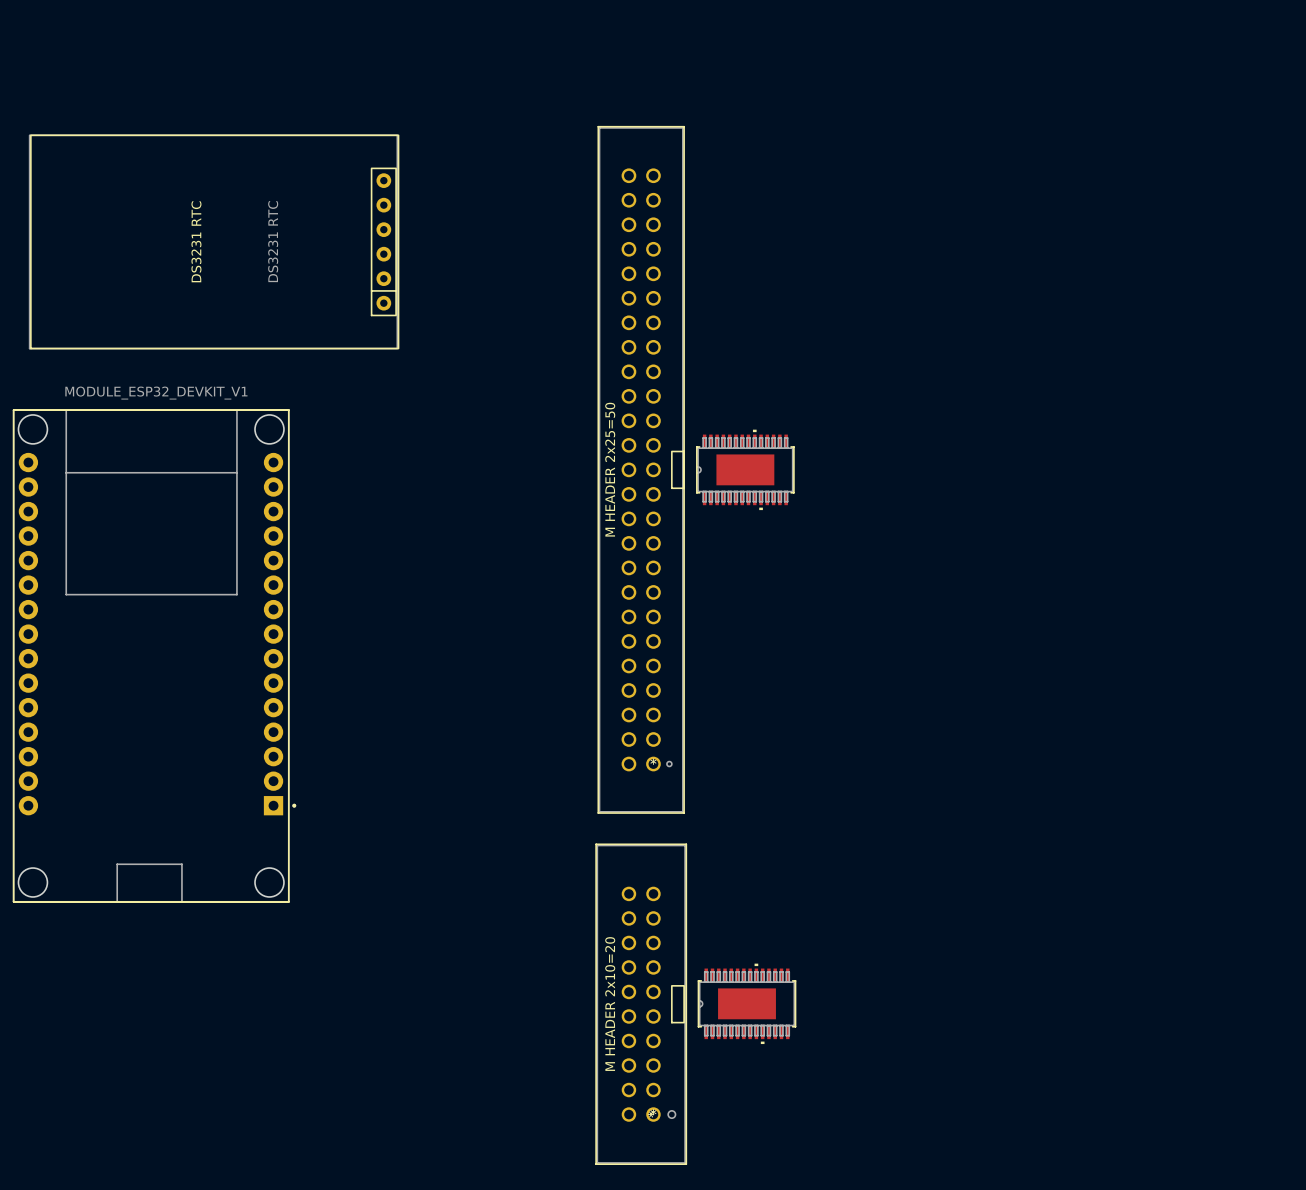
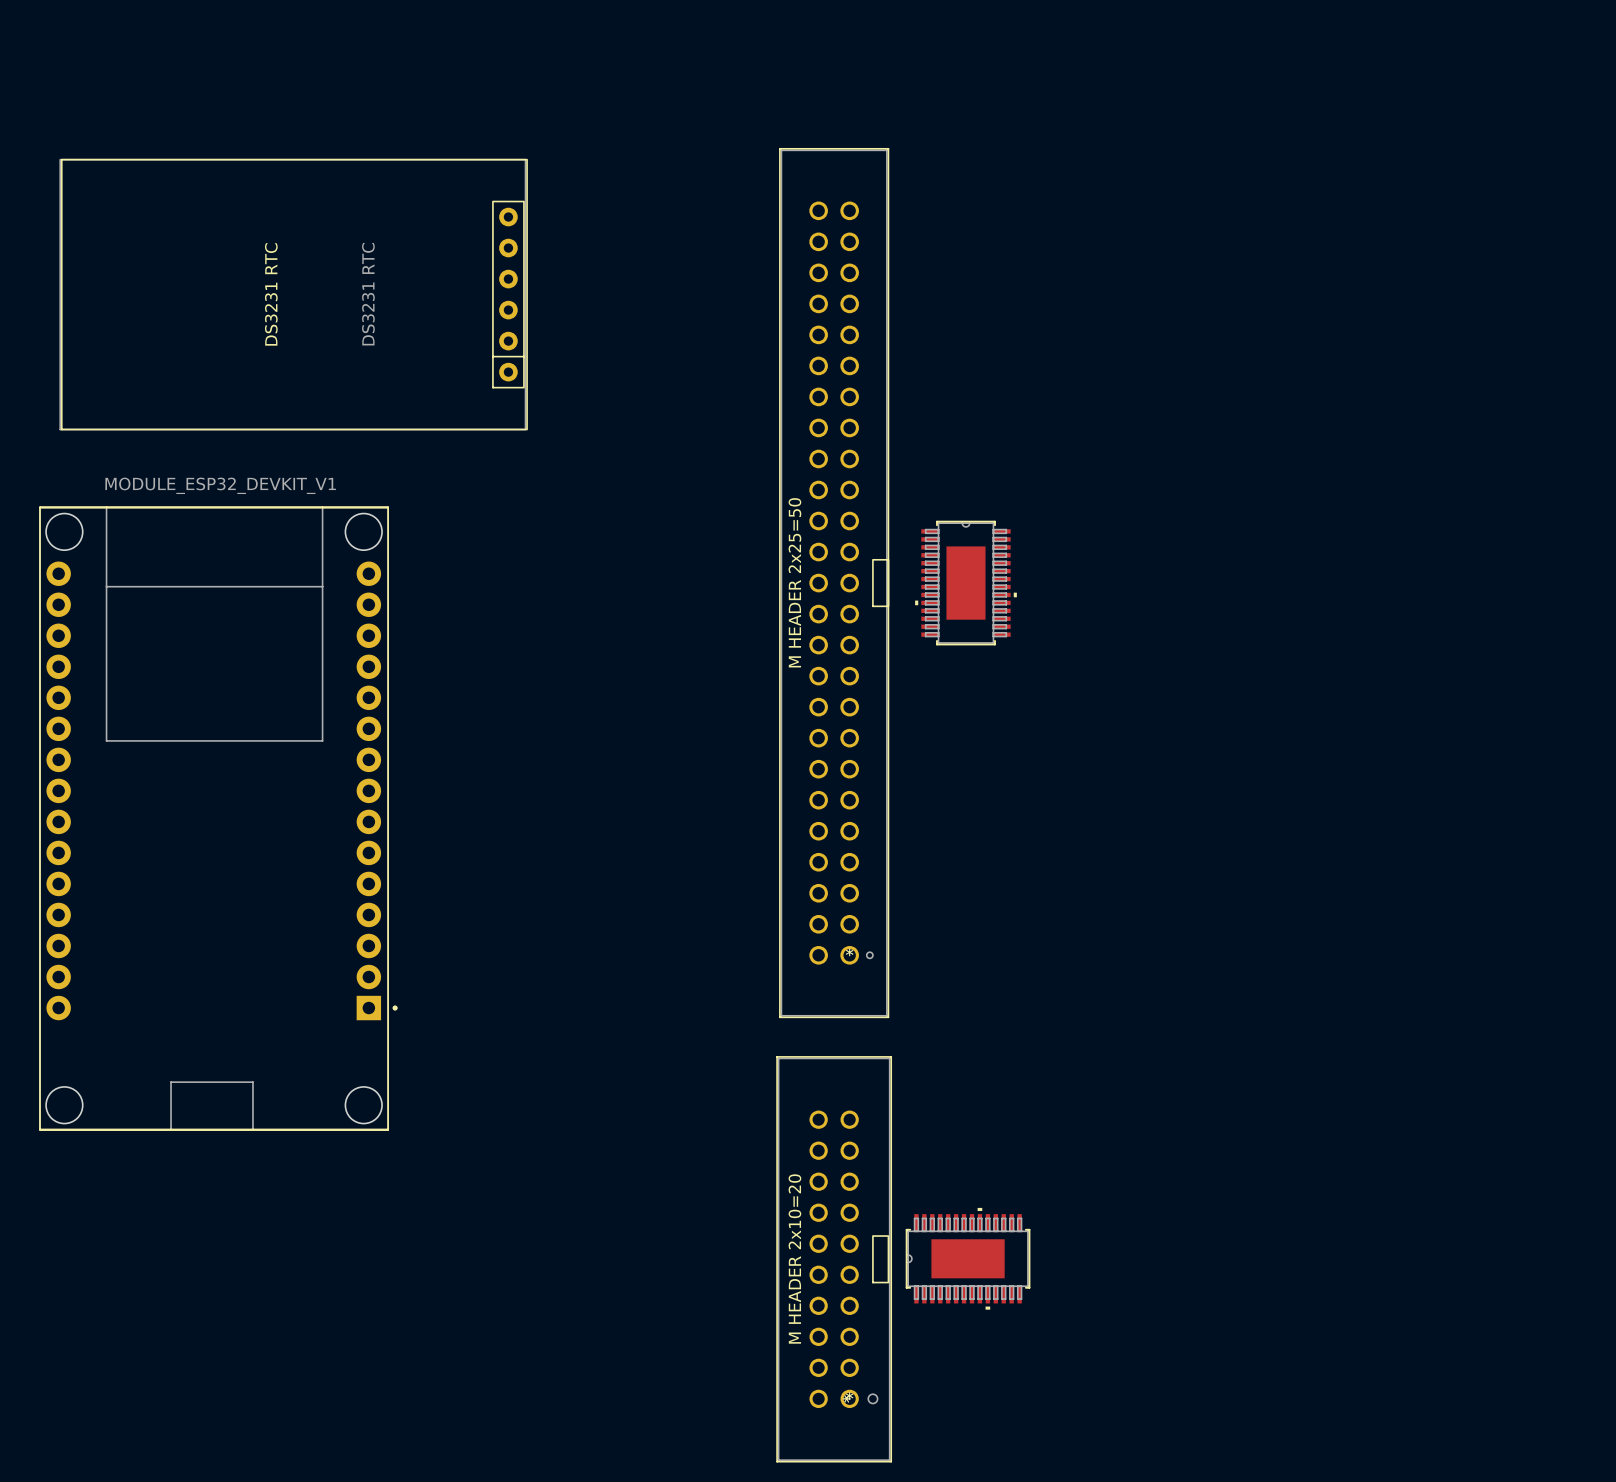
part rotation: 0° (745, 469) -> 90° clockwise (965, 583)

